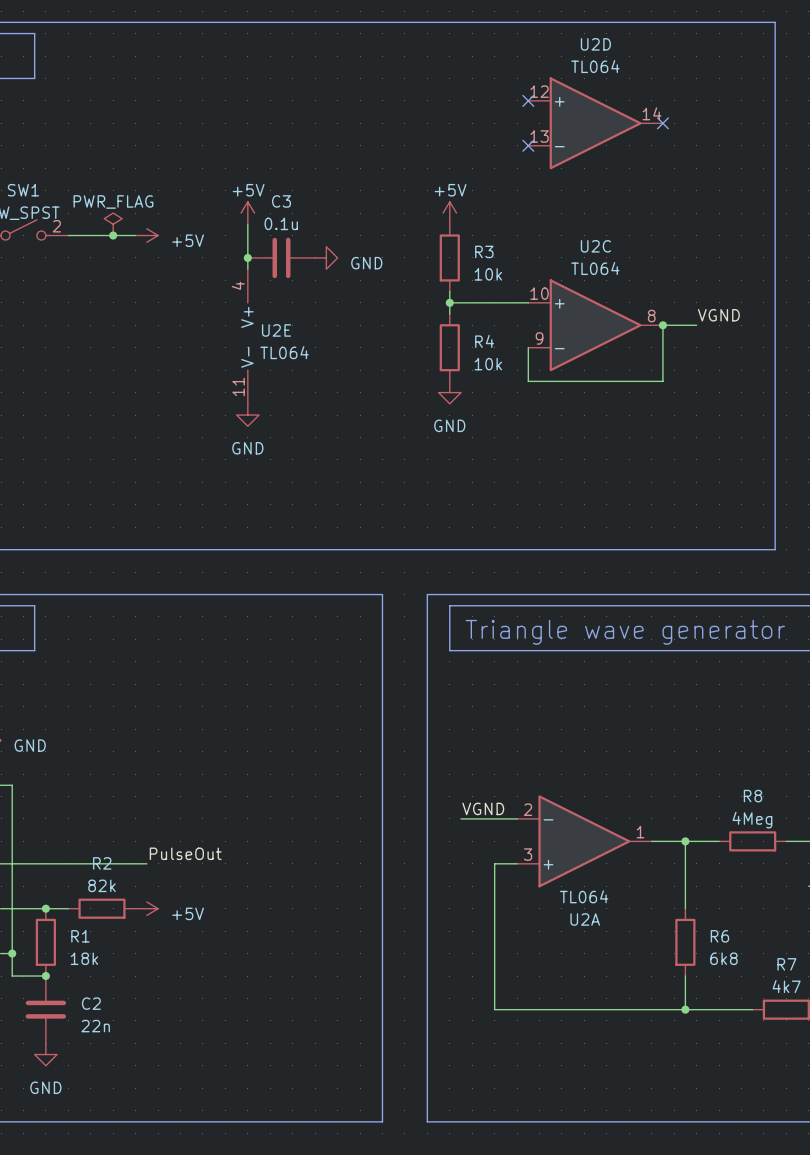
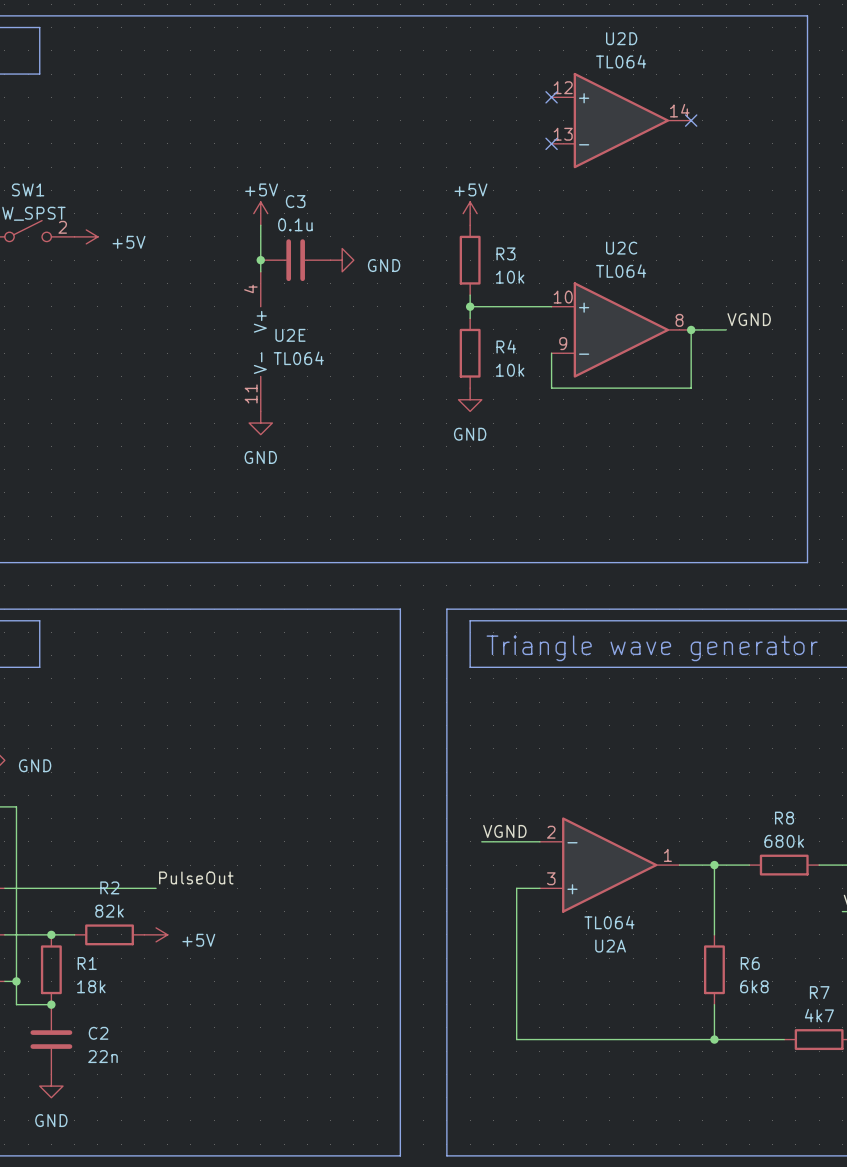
power symbol: PWR_FLAG (113, 224) -> none
wire: (68, 235) (135, 235) -> none
junction: (113, 235) -> none
power symbol position: +5V (146, 235) -> +5V (86, 236)
R8 value: 4Meg (752, 820) -> 680k (784, 841)

